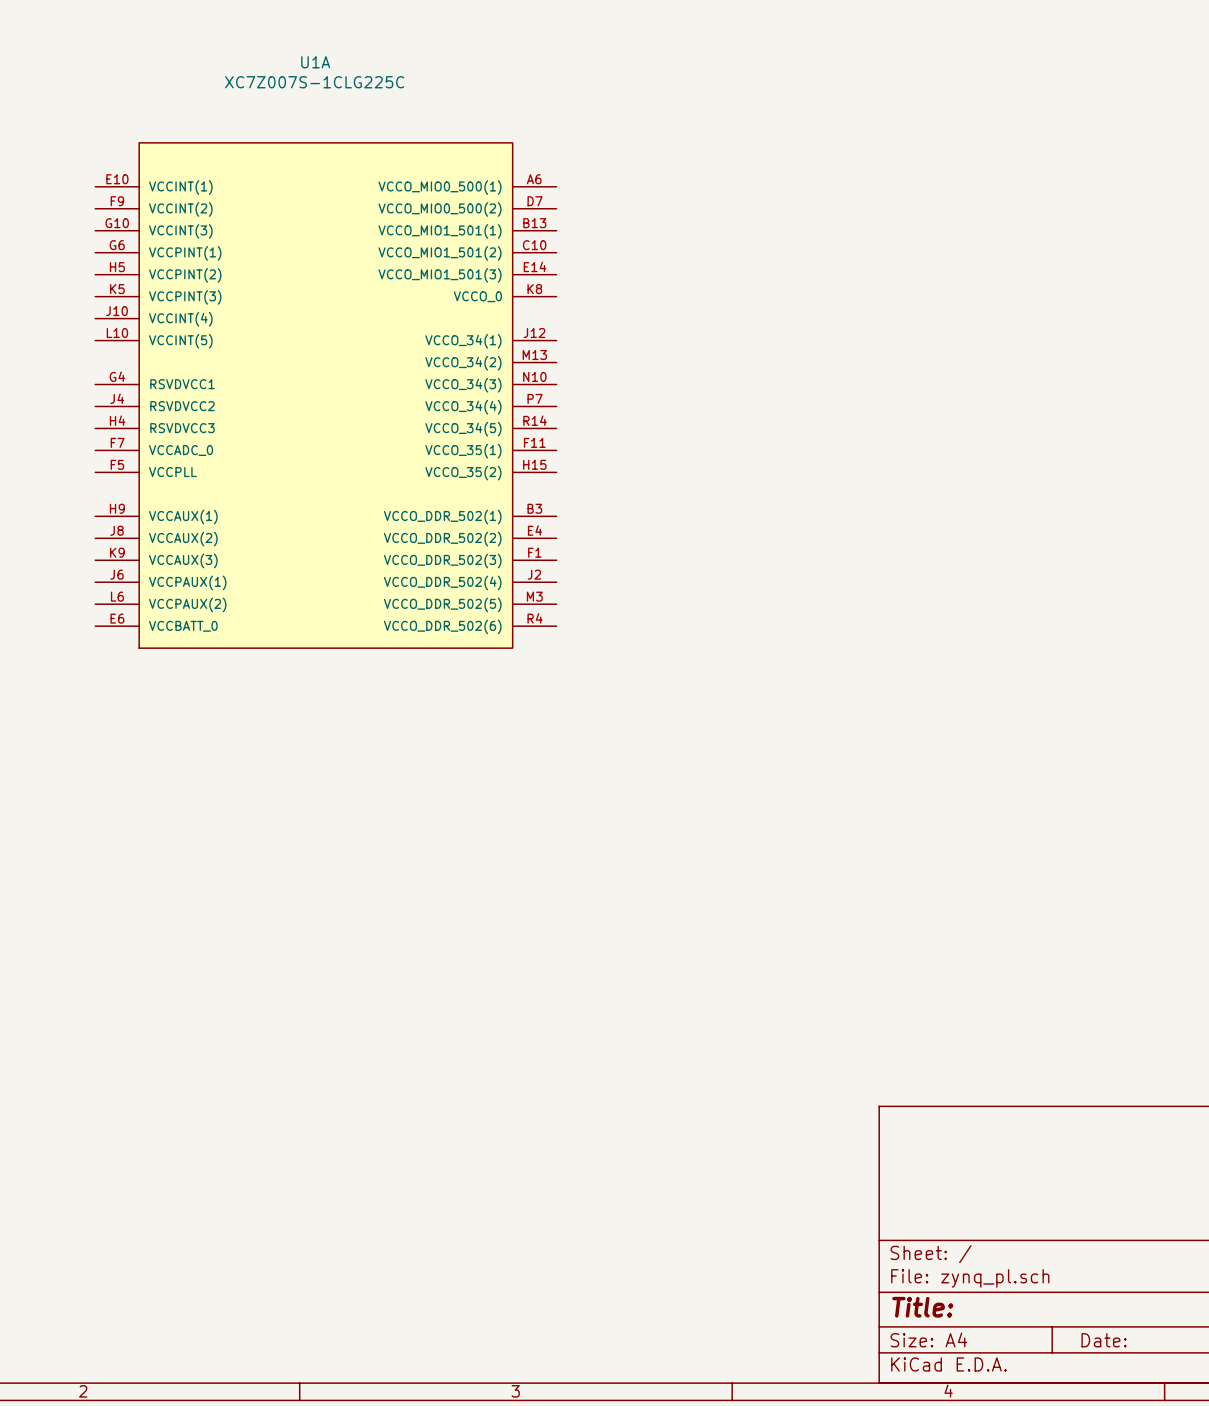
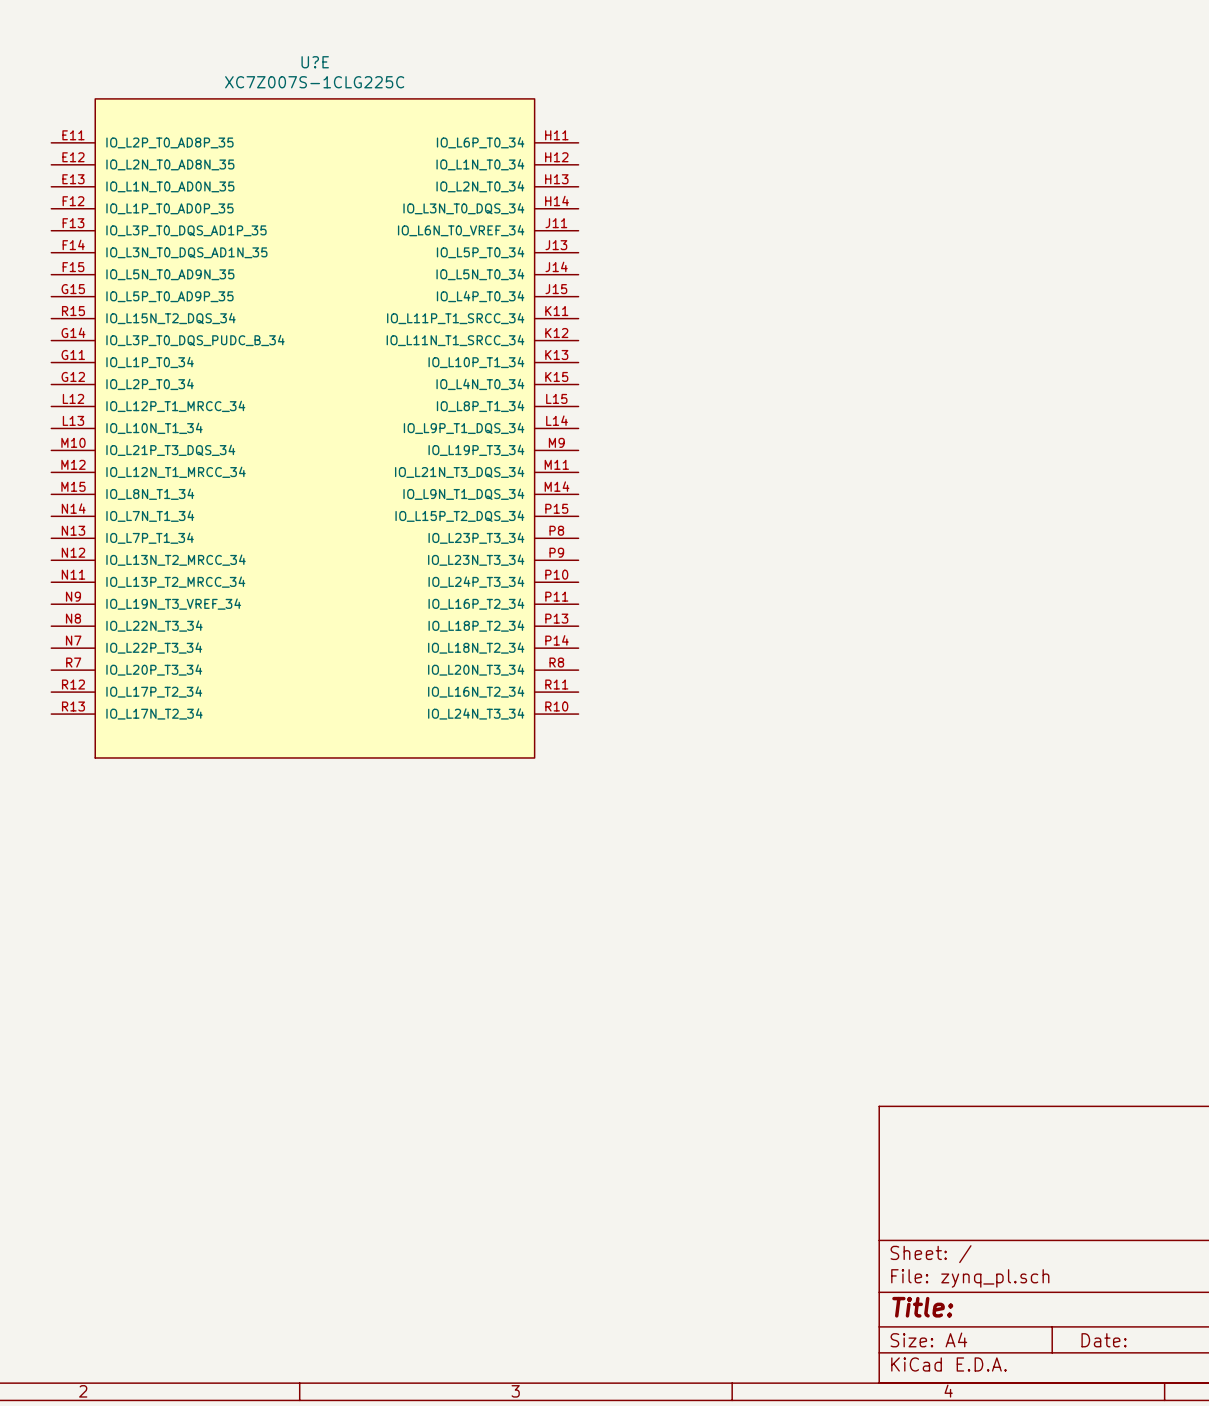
U1A: XC7Z007S-1CLG225C (325, 395) -> none
U?E: none -> XC7Z007S-1CLG225C (314, 428)

